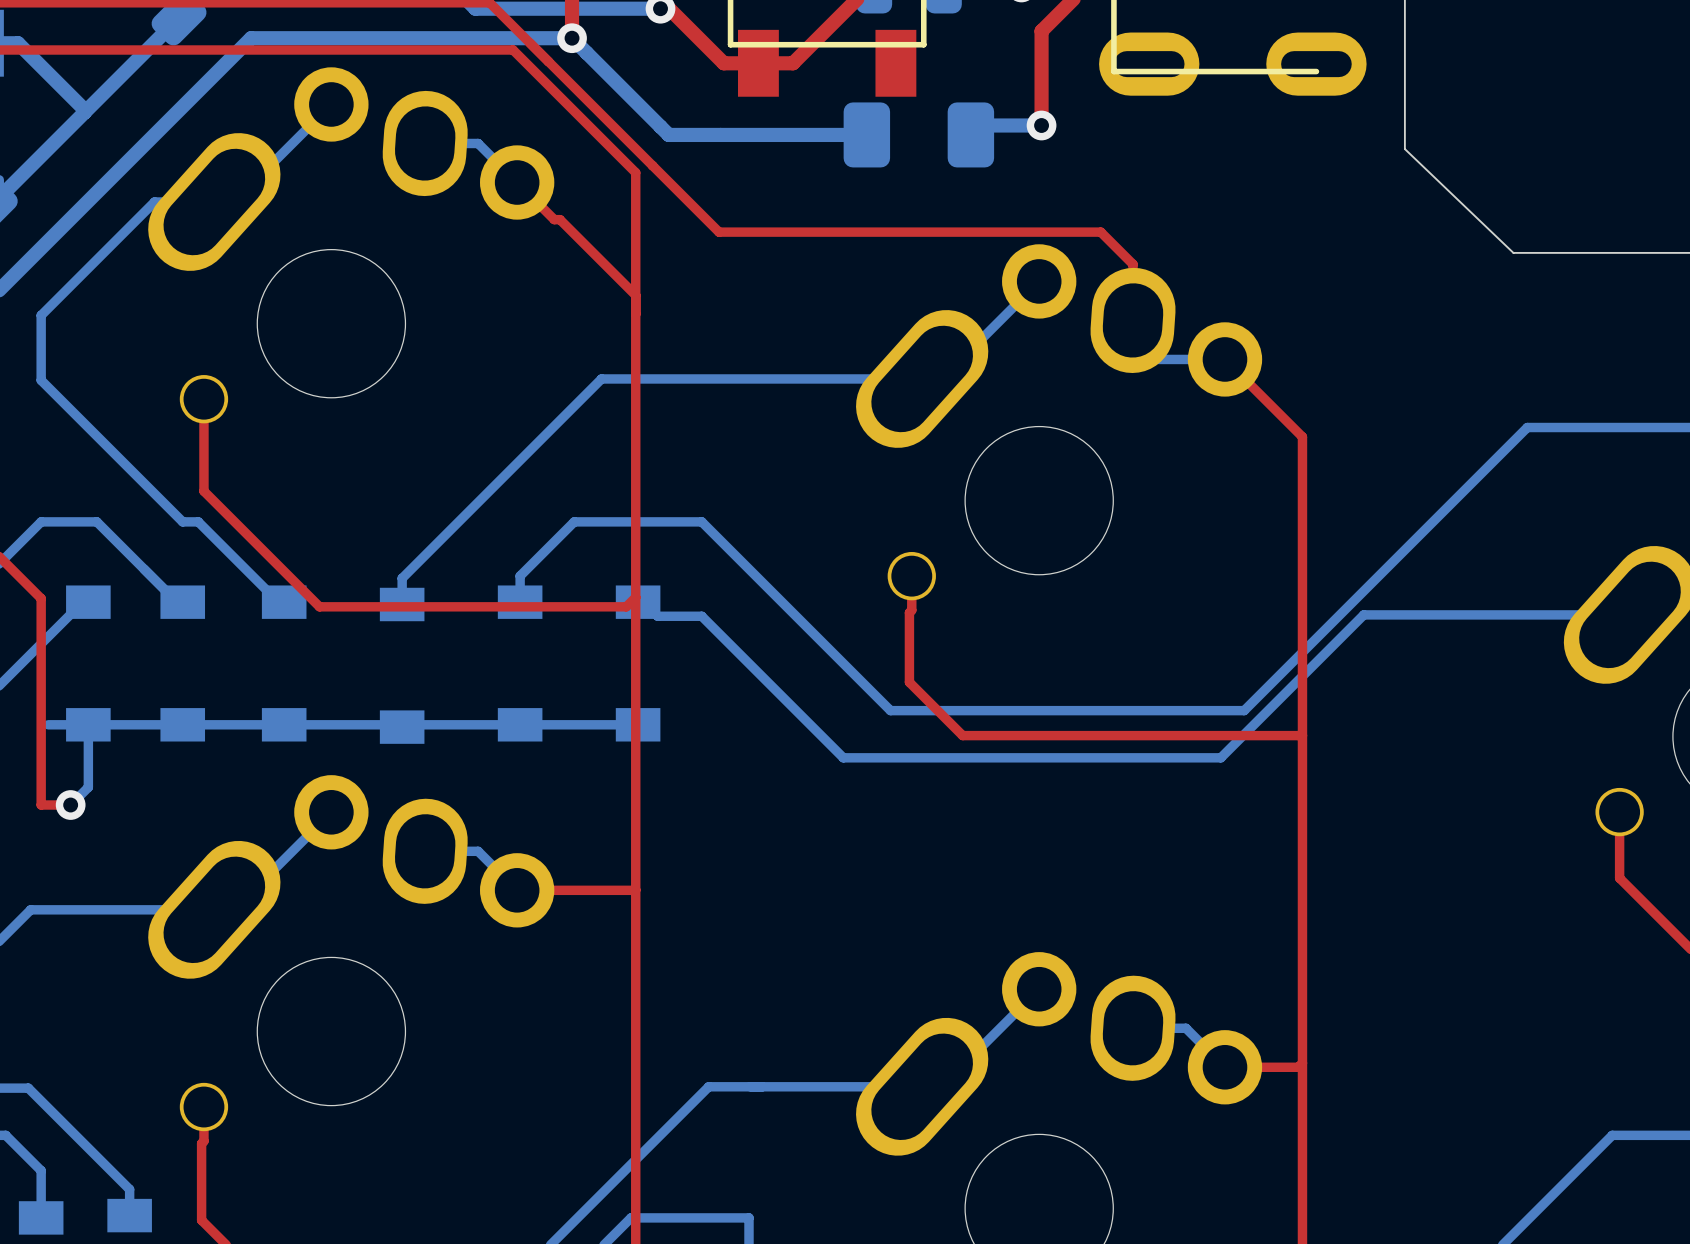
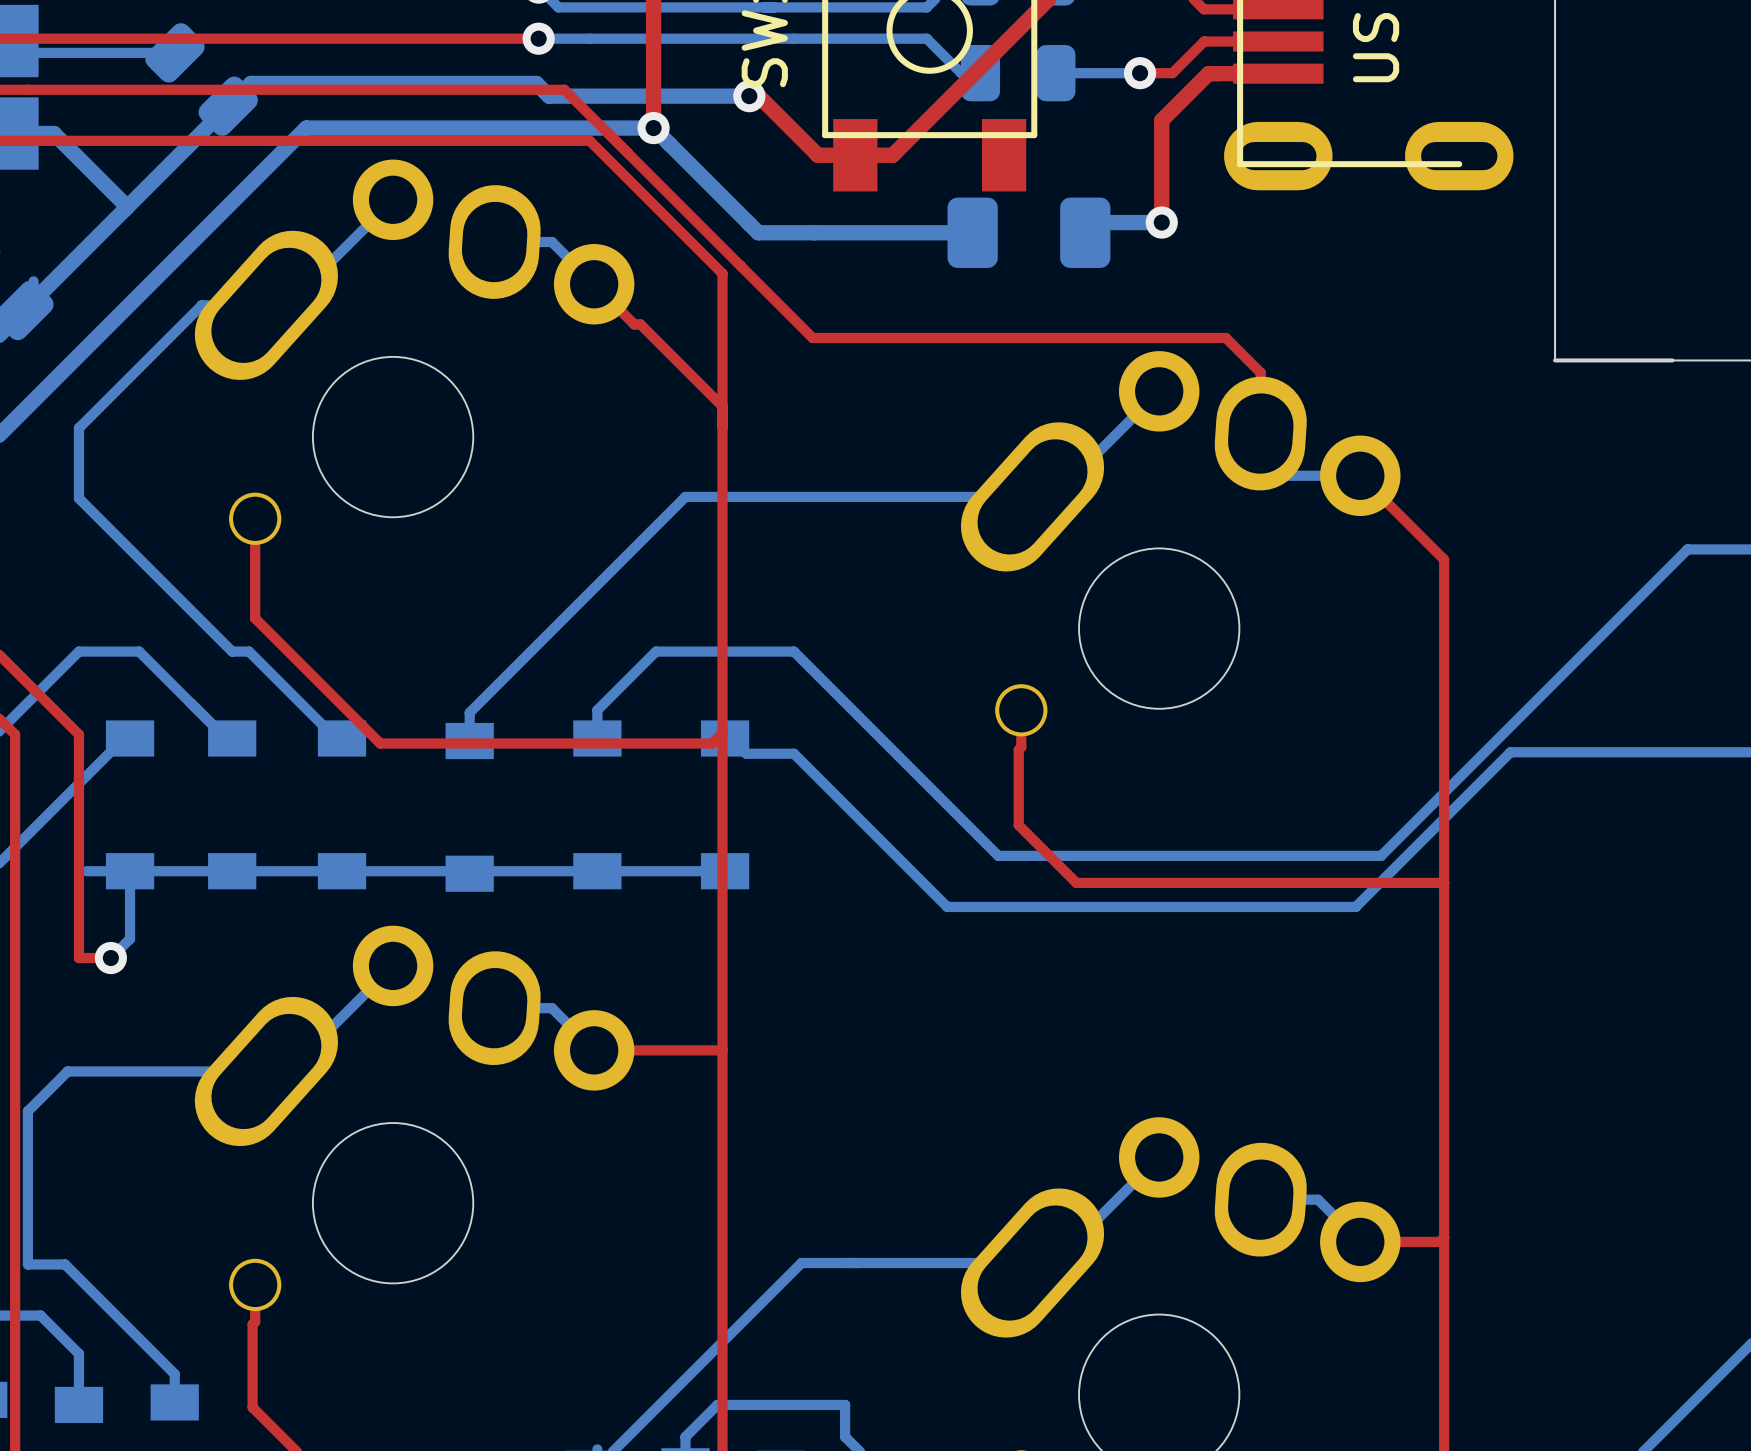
board edge: (1404, 149) (1513, 252) -> (1555, 248) (1555, 360) (1672, 360)

